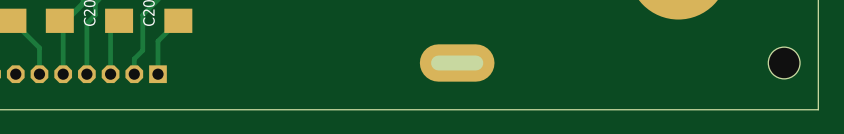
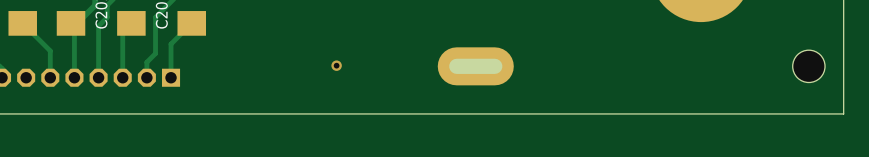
via: none -> (336, 65)

